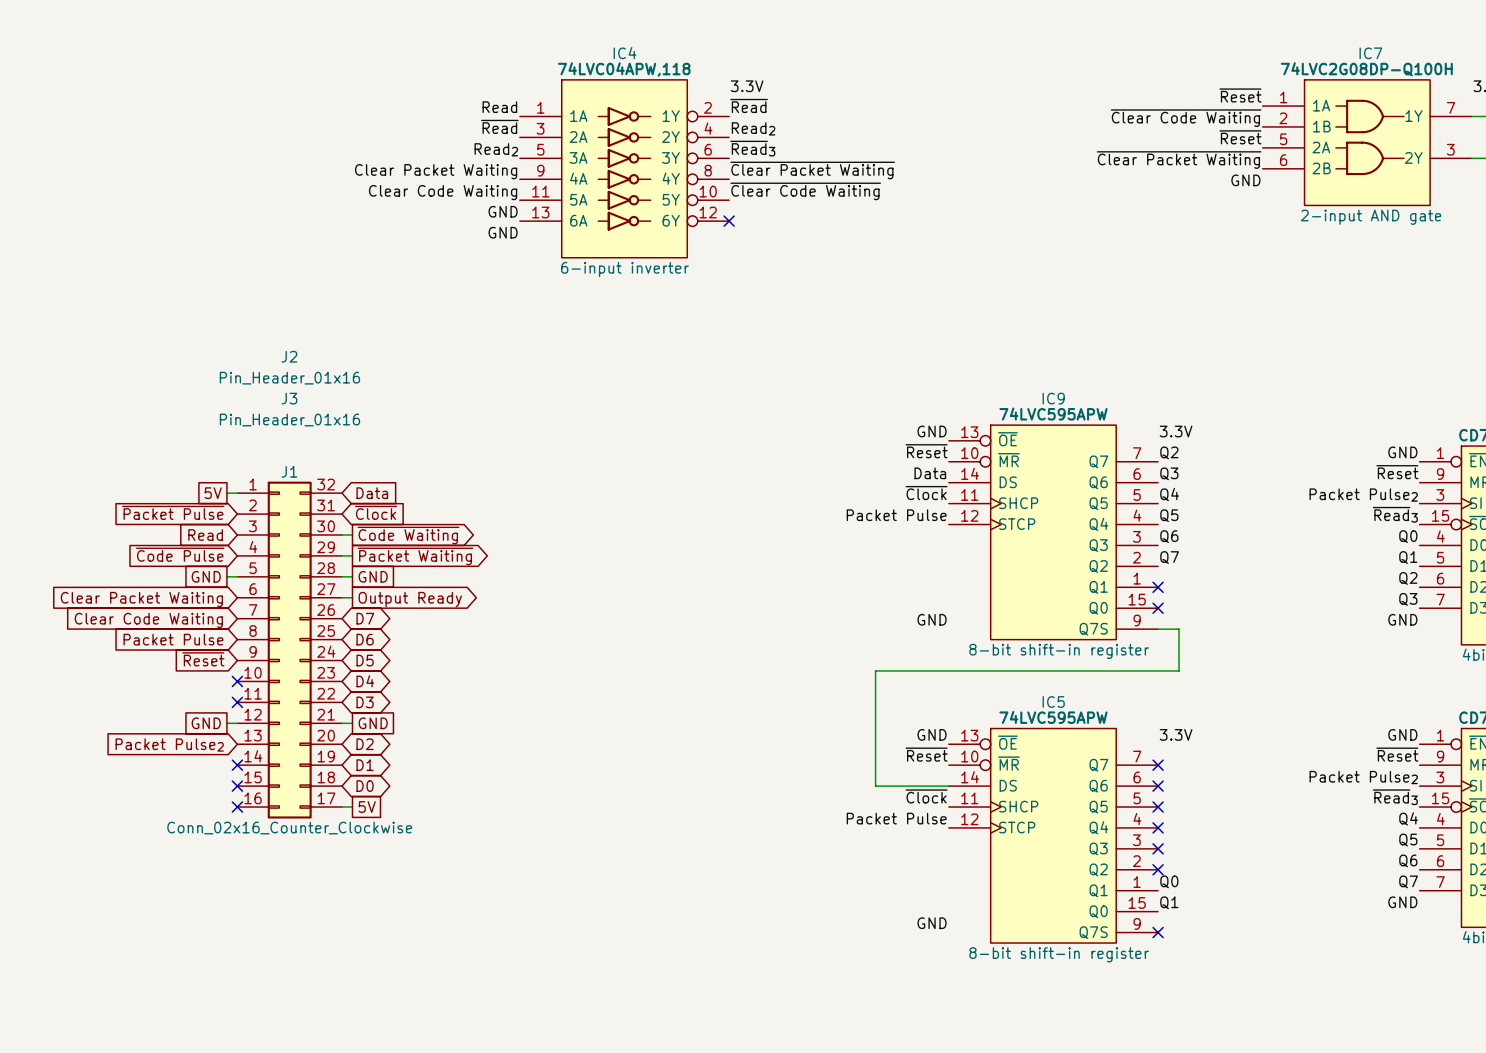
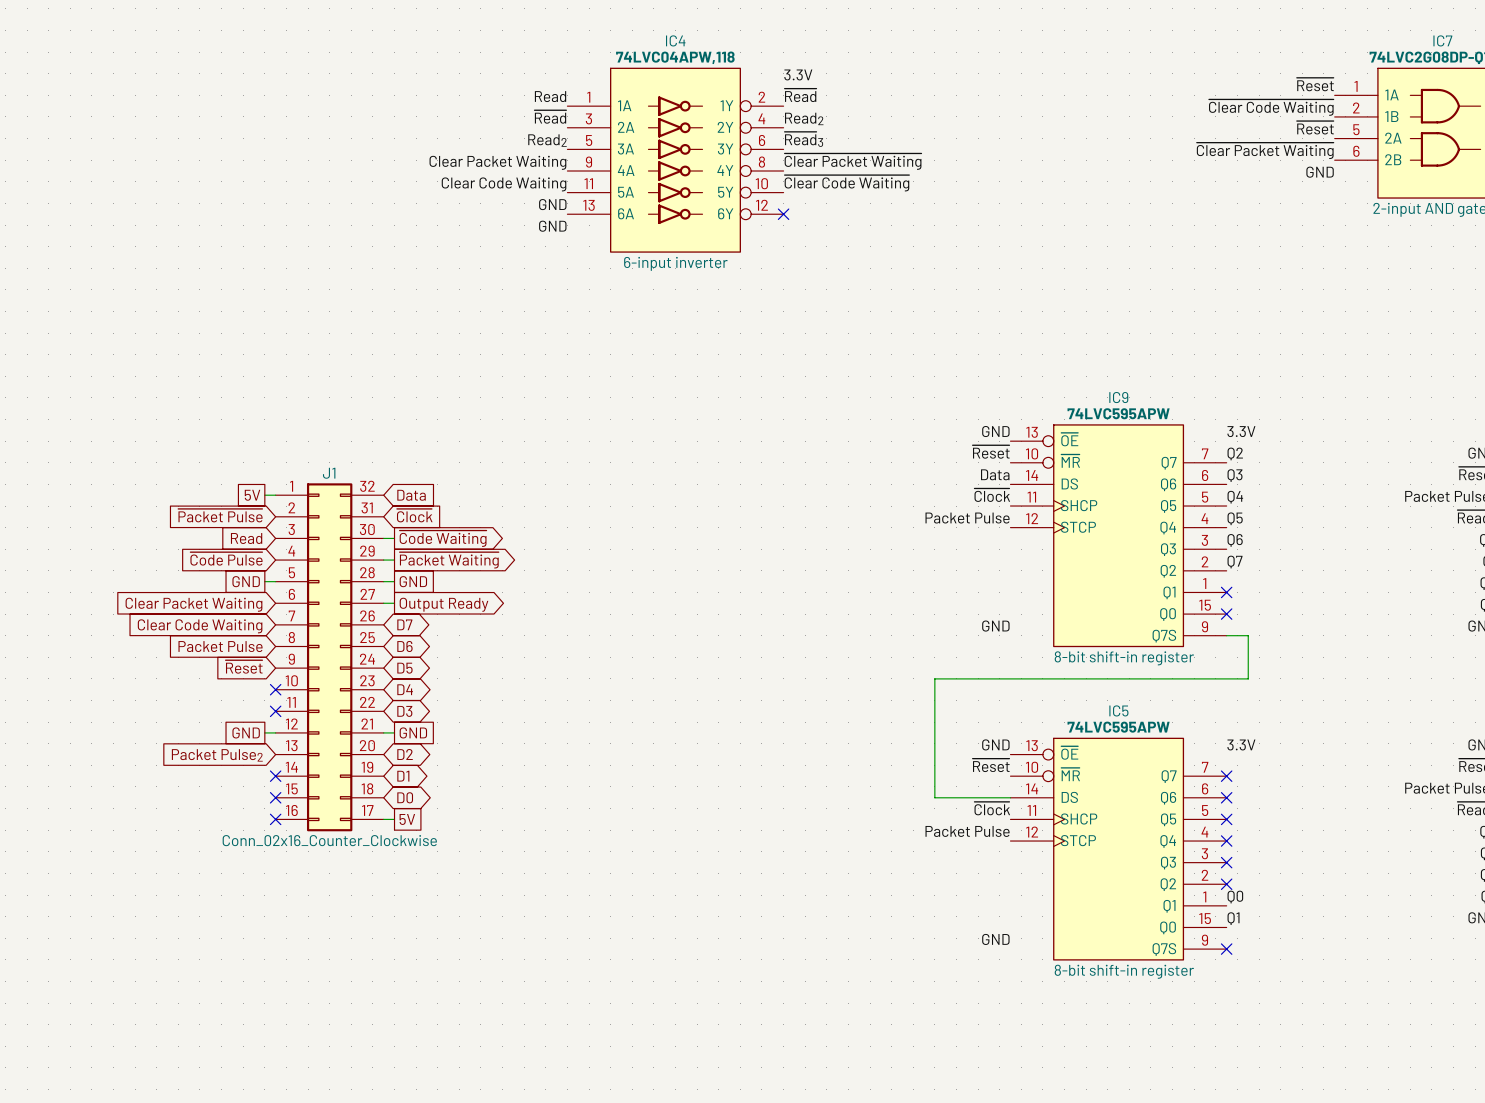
J2: Pin_Header_01x16 (289, 367) -> none
J3: Pin_Header_01x16 (289, 409) -> none

